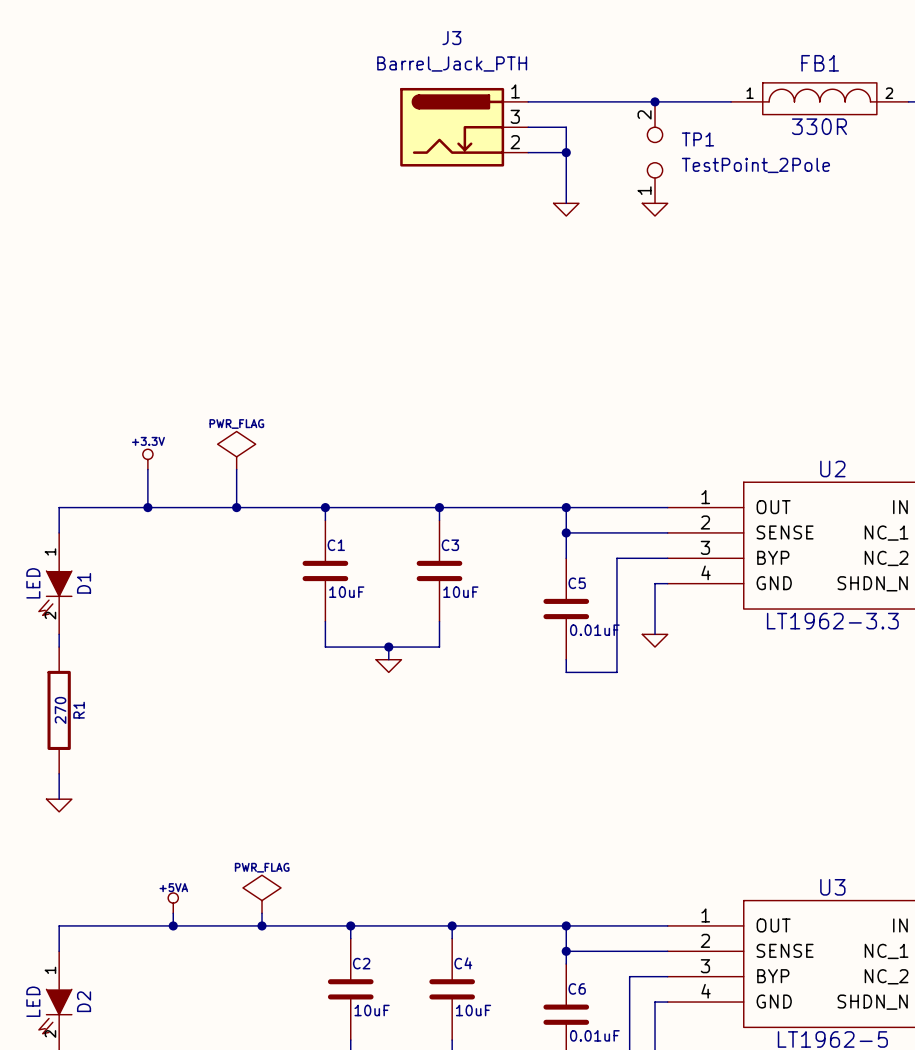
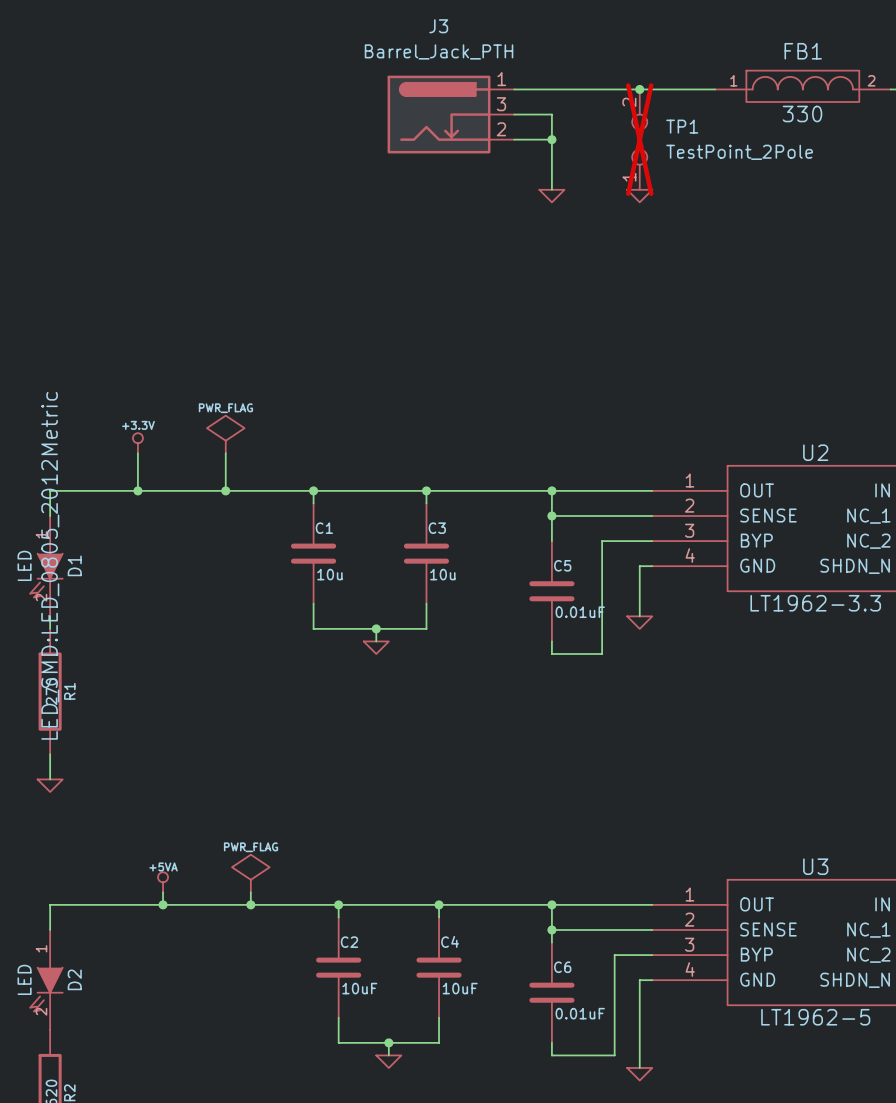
FB1 value: 330R (819, 126) -> 330 (802, 113)
TP1 do-not-place cross: none -> (639, 139)
D1 text: none -> LED_SMD:LED_0805_2012Metric (50, 565)
C1 value: 10uF (346, 592) -> 10u (329, 574)
C3 value: 10uF (460, 592) -> 10u (442, 574)

